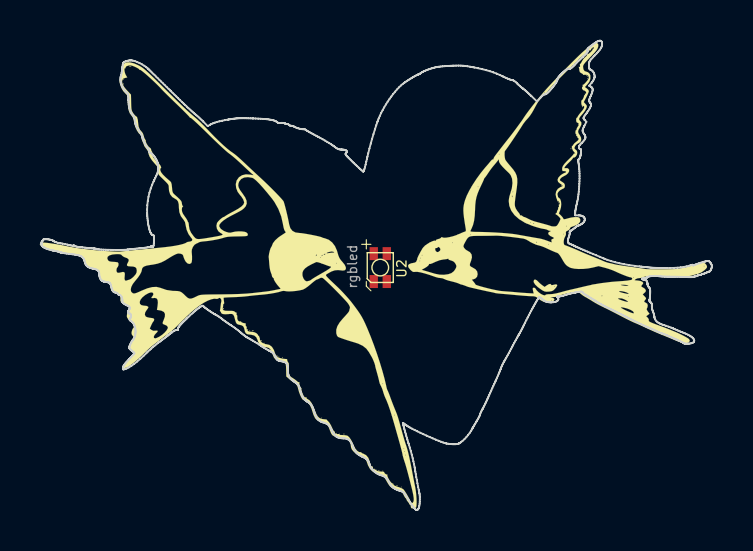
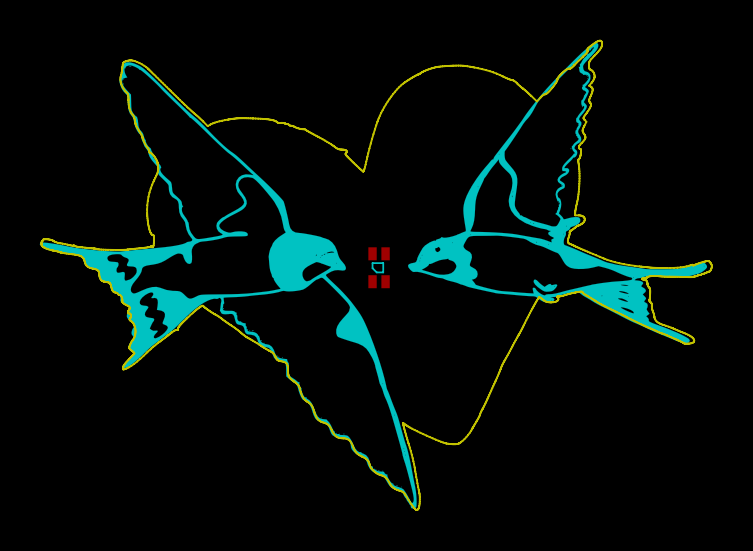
U2: rgbled (377, 265) -> none
part: none -> (379, 267)

